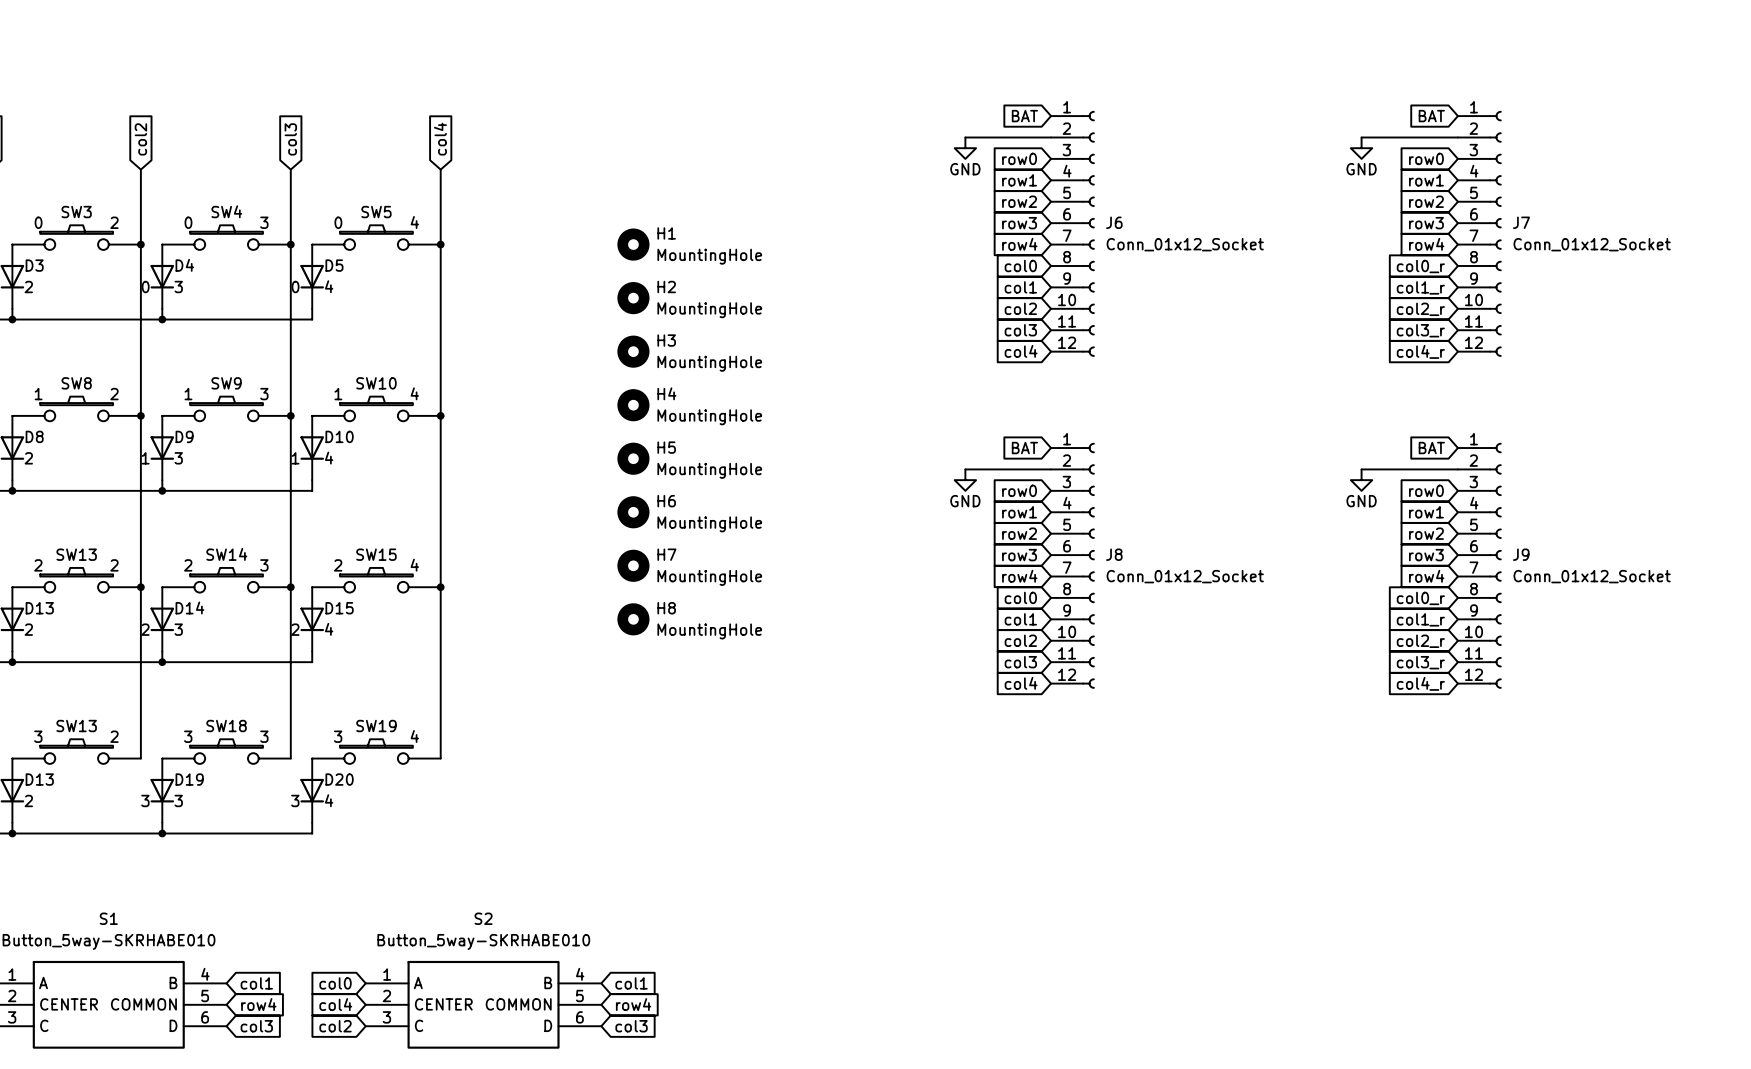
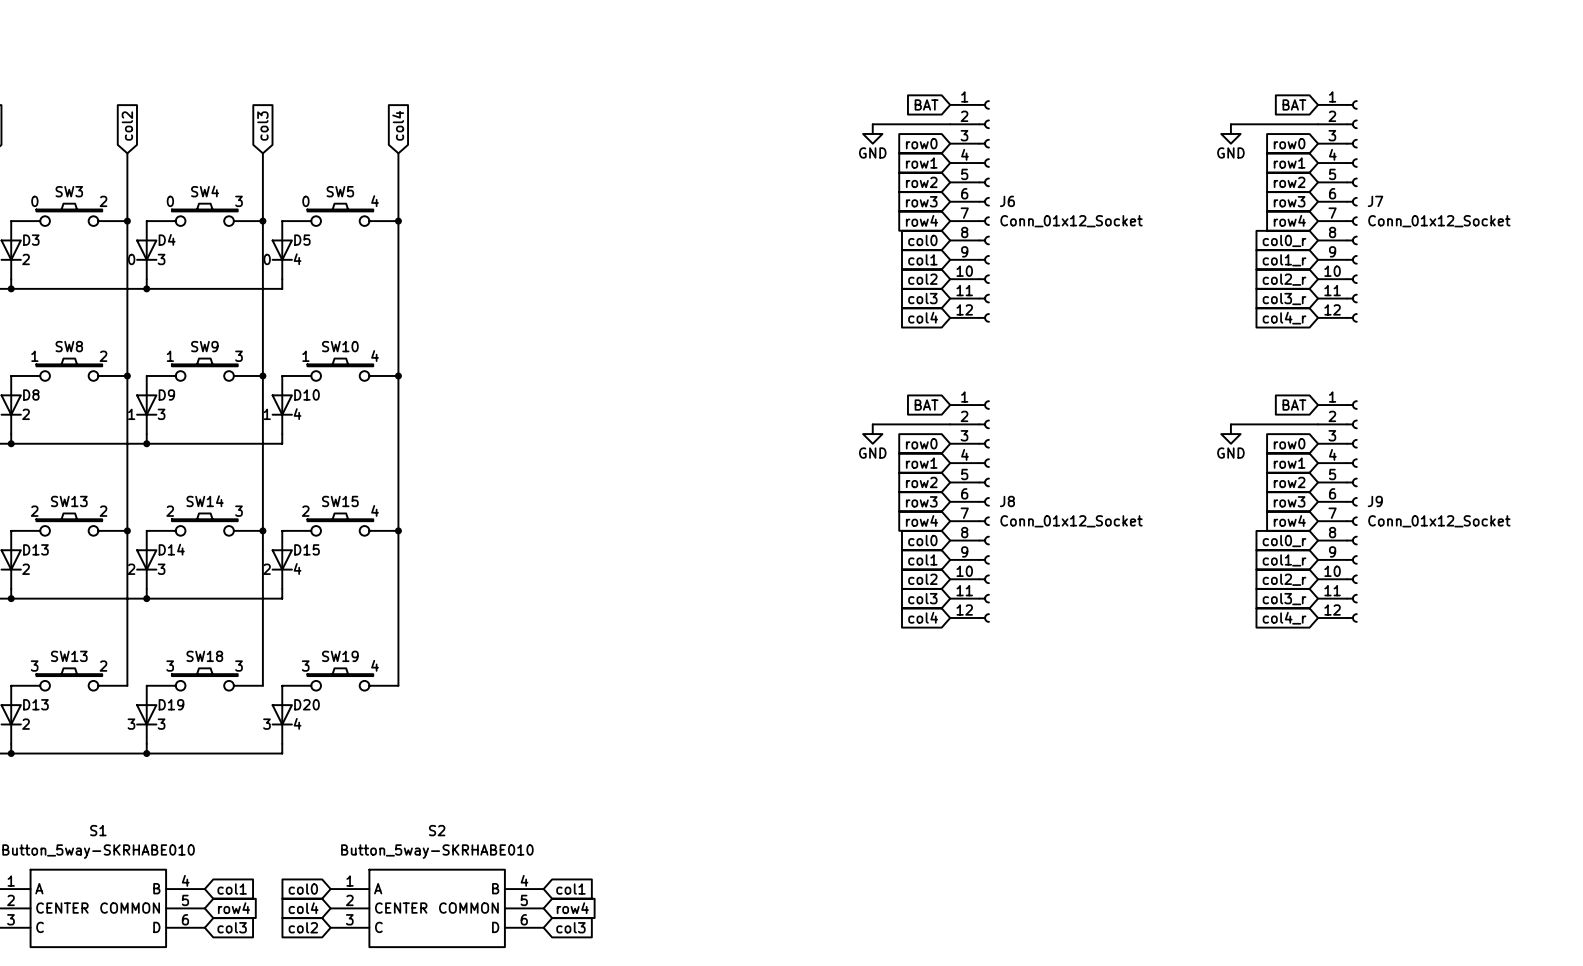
H1: MountingHole (633, 244) -> none
H2: MountingHole (633, 298) -> none
H3: MountingHole (633, 351) -> none
H4: MountingHole (633, 405) -> none
H5: MountingHole (633, 458) -> none
H6: MountingHole (633, 512) -> none
H7: MountingHole (633, 565) -> none
H8: MountingHole (633, 619) -> none

